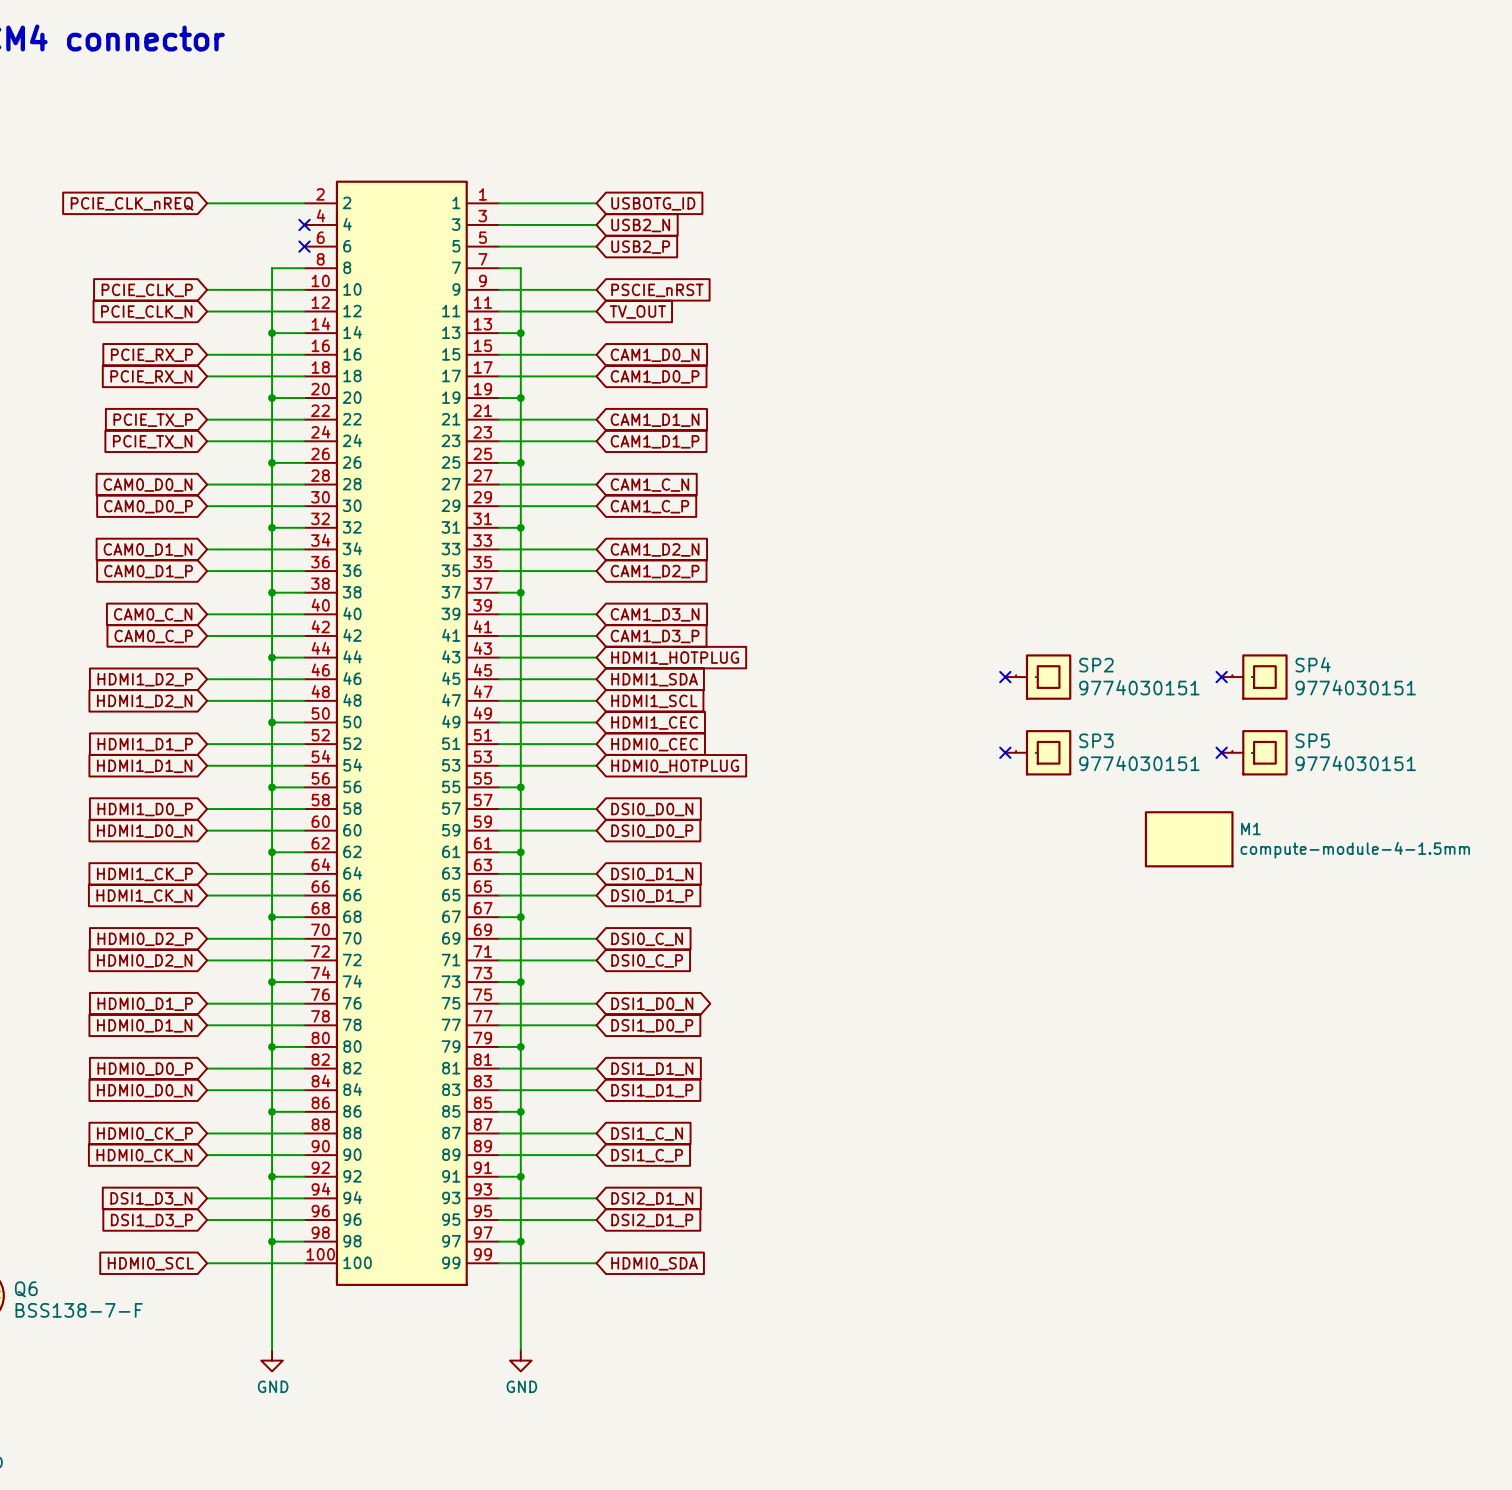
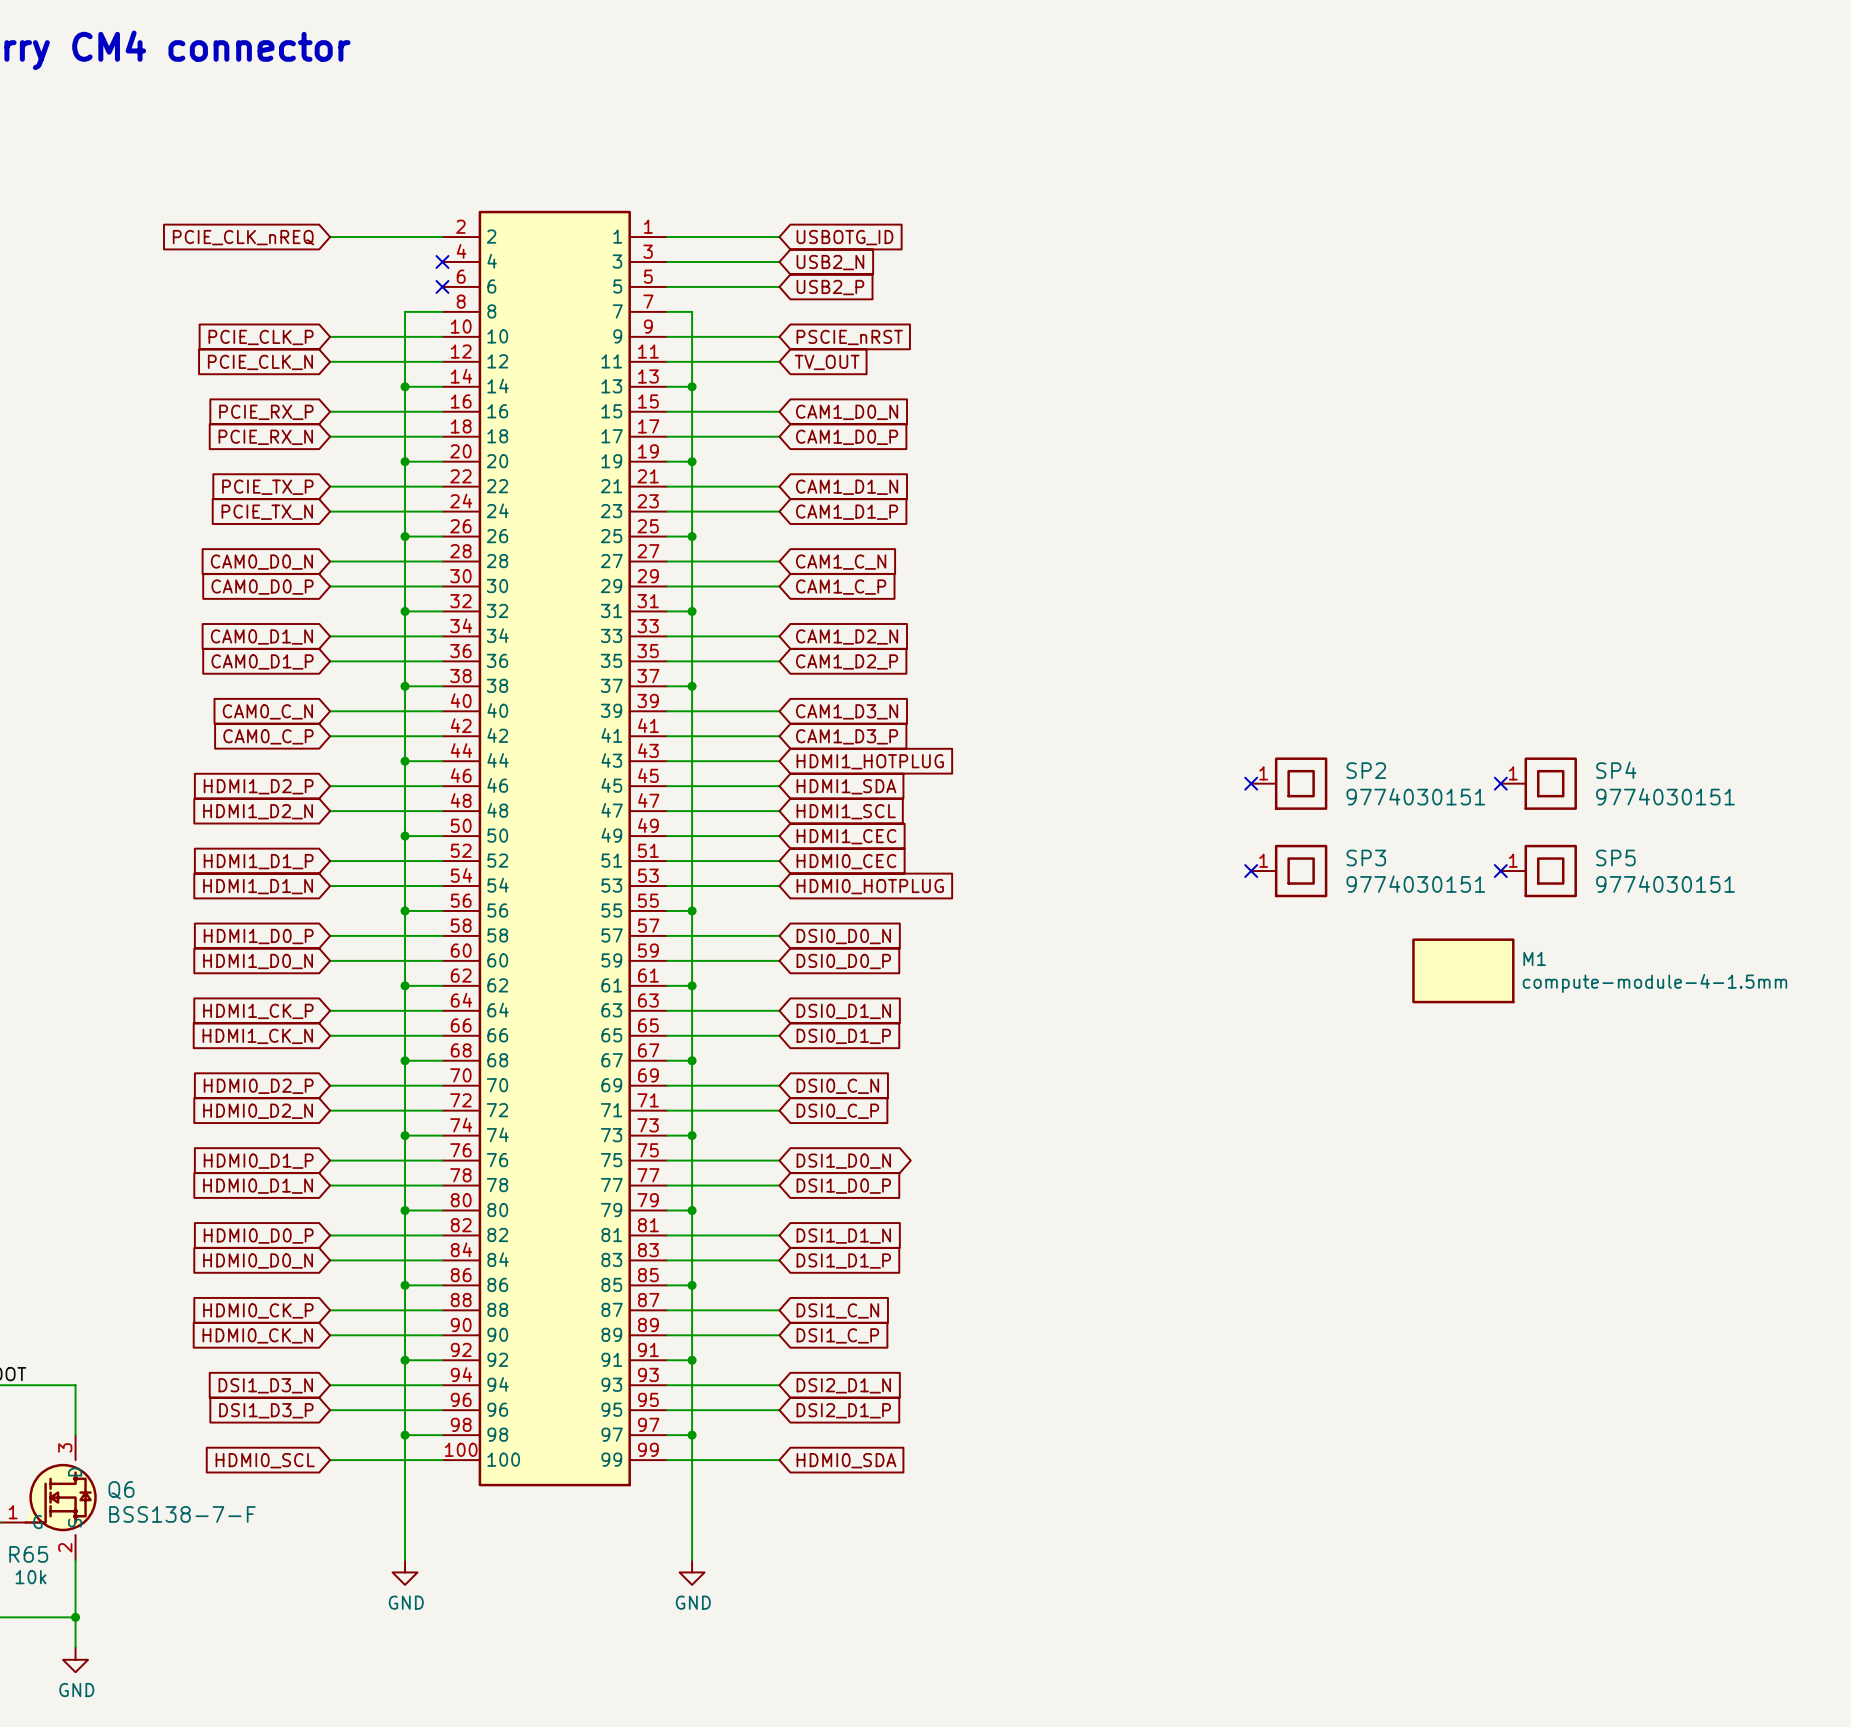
SP2 symbol: [1005, 654, 1072, 700] -> [1251, 757, 1328, 810]
SP4 symbol: [1221, 654, 1288, 700] -> [1500, 757, 1577, 810]
SP3 symbol: [1005, 730, 1072, 776] -> [1251, 844, 1328, 898]
SP5 symbol: [1221, 730, 1288, 776] -> [1500, 844, 1577, 898]

